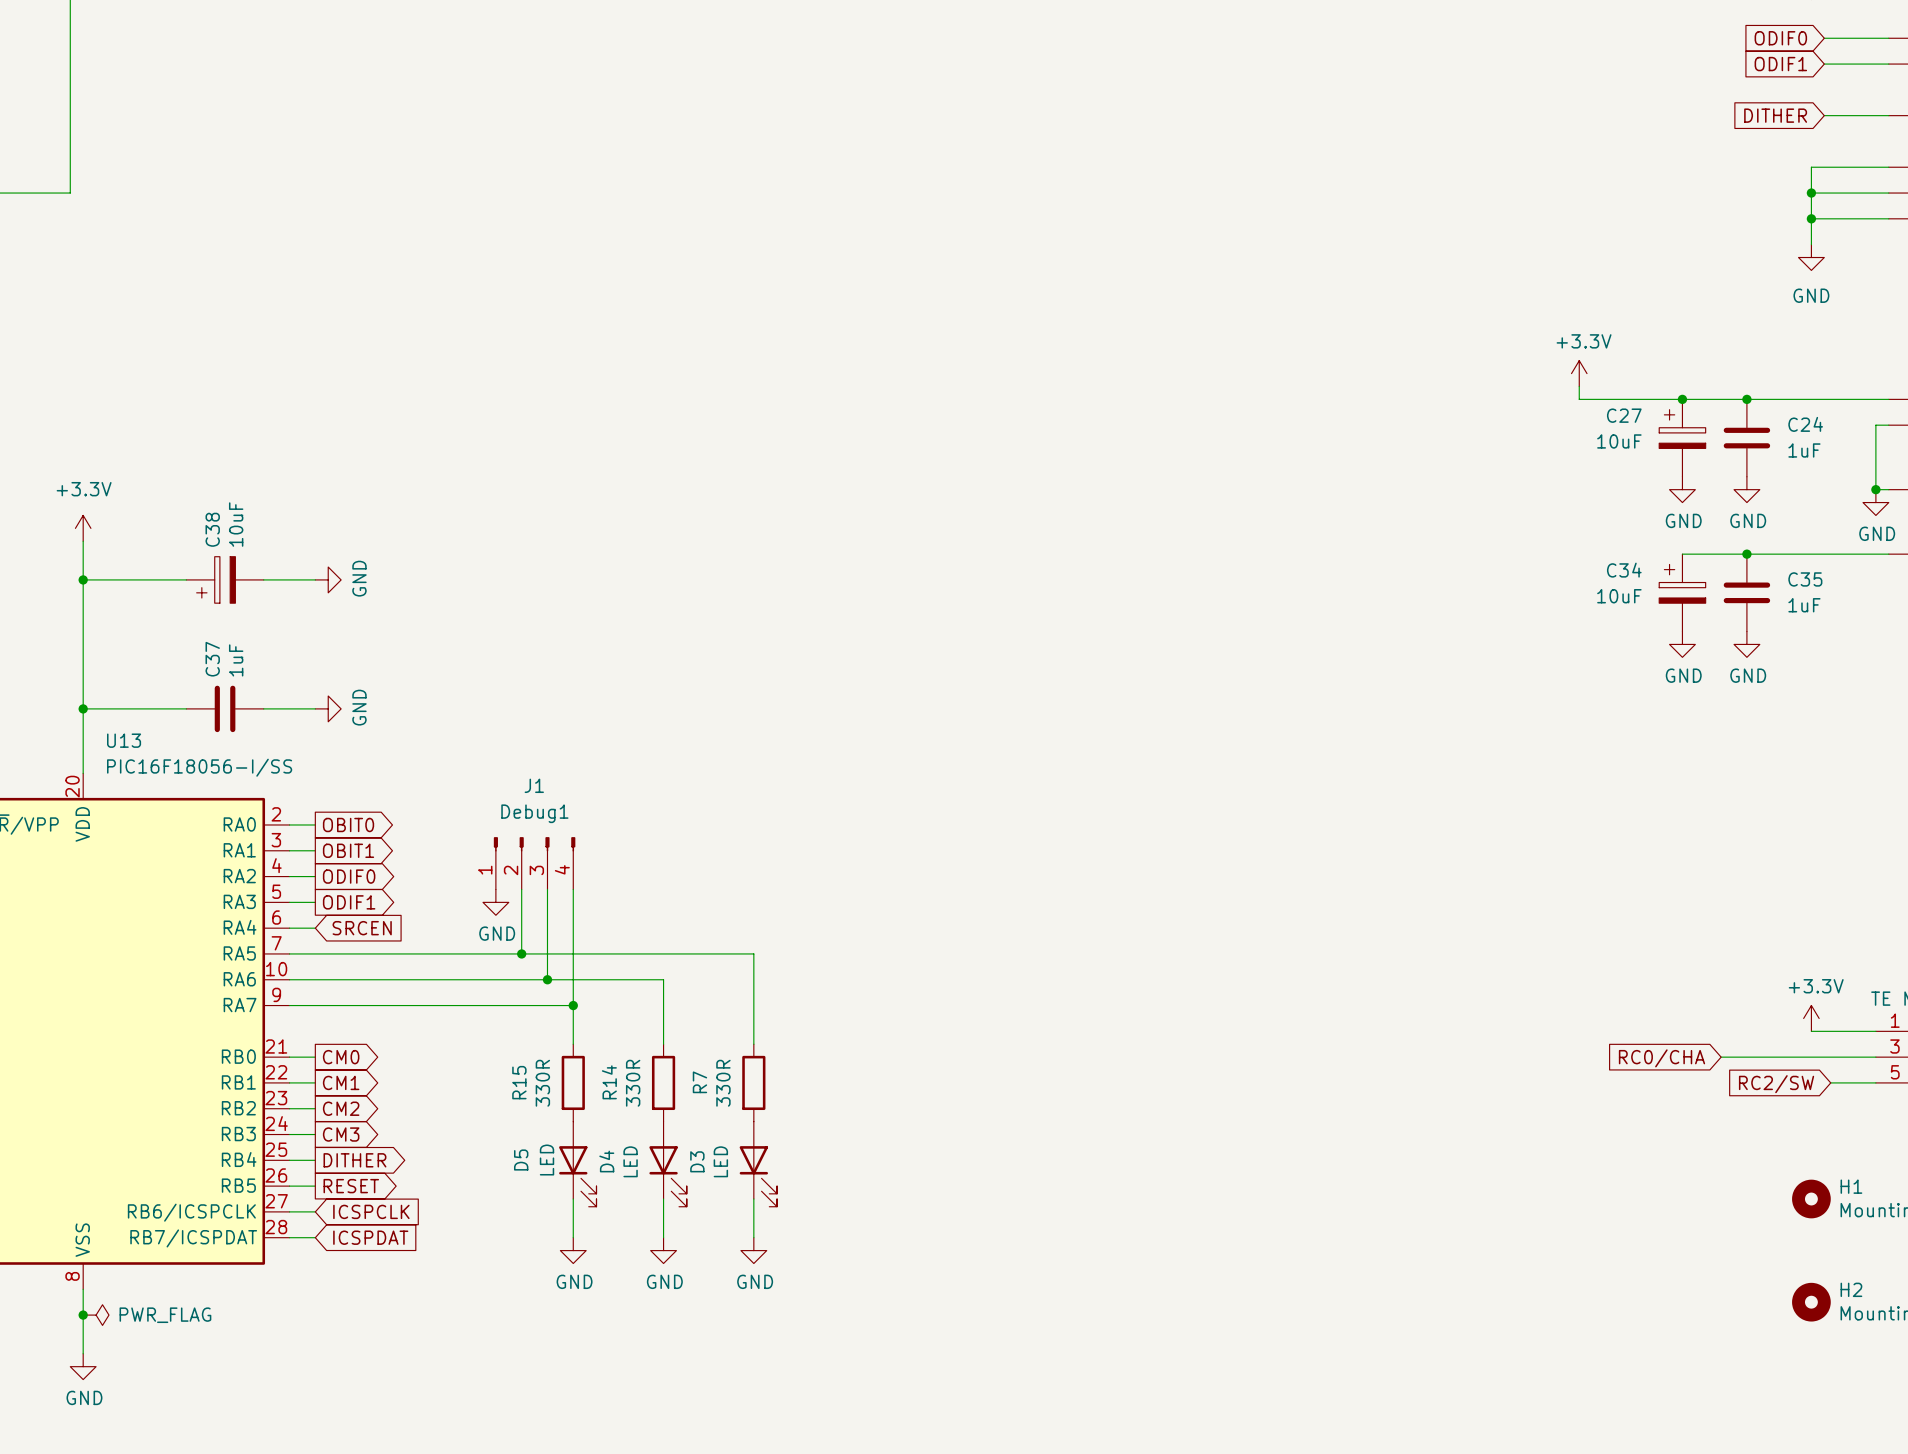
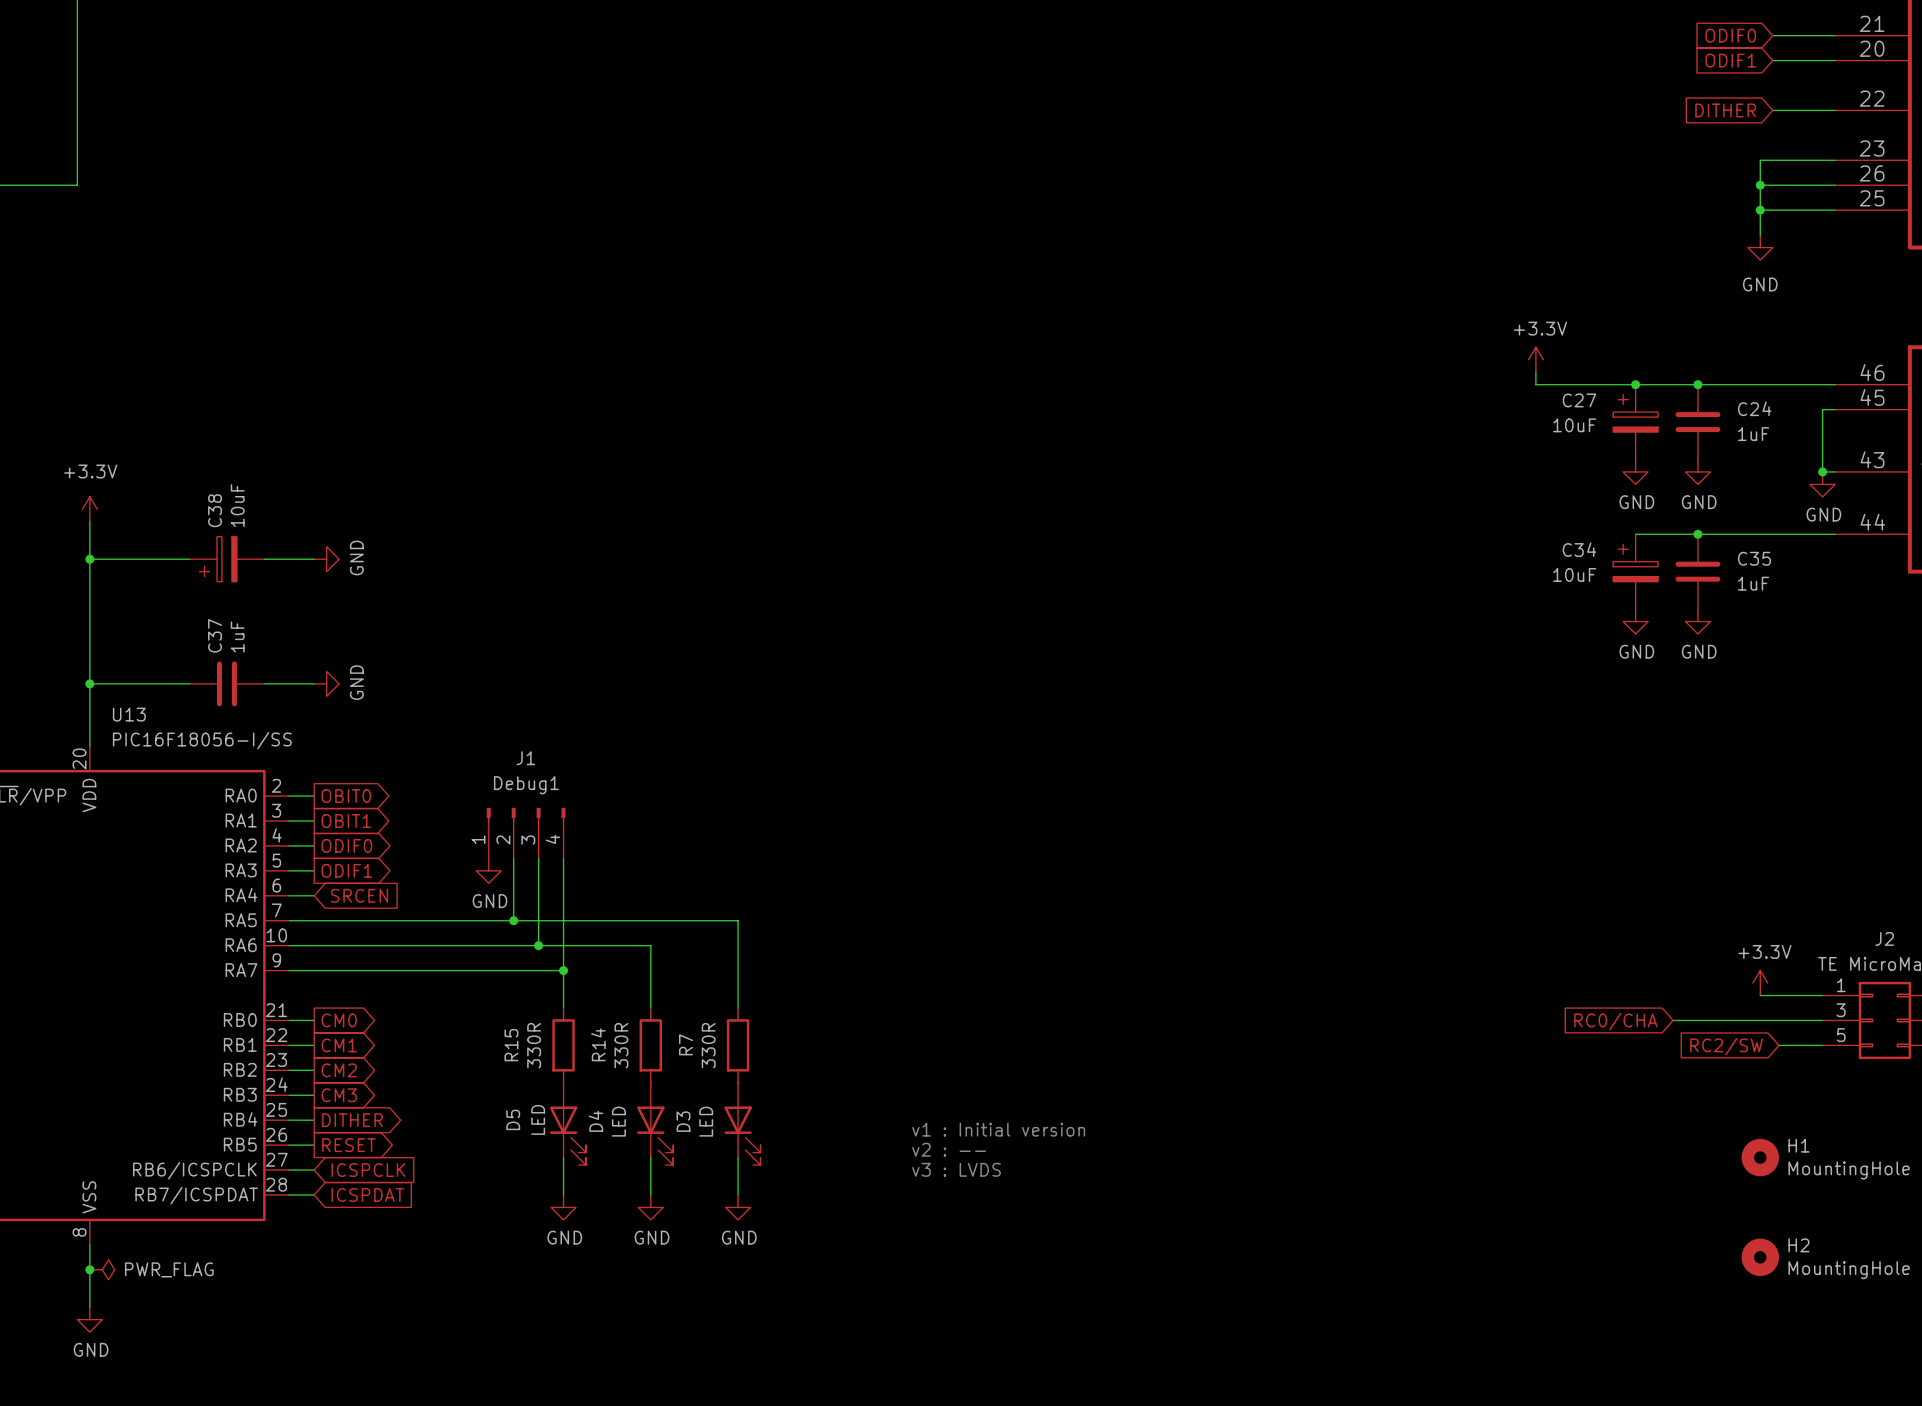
text: none -> v1 : Initial version (998, 1129)
text: none -> v2 : -- (949, 1149)
text: none -> v3 : LVDS (956, 1169)

